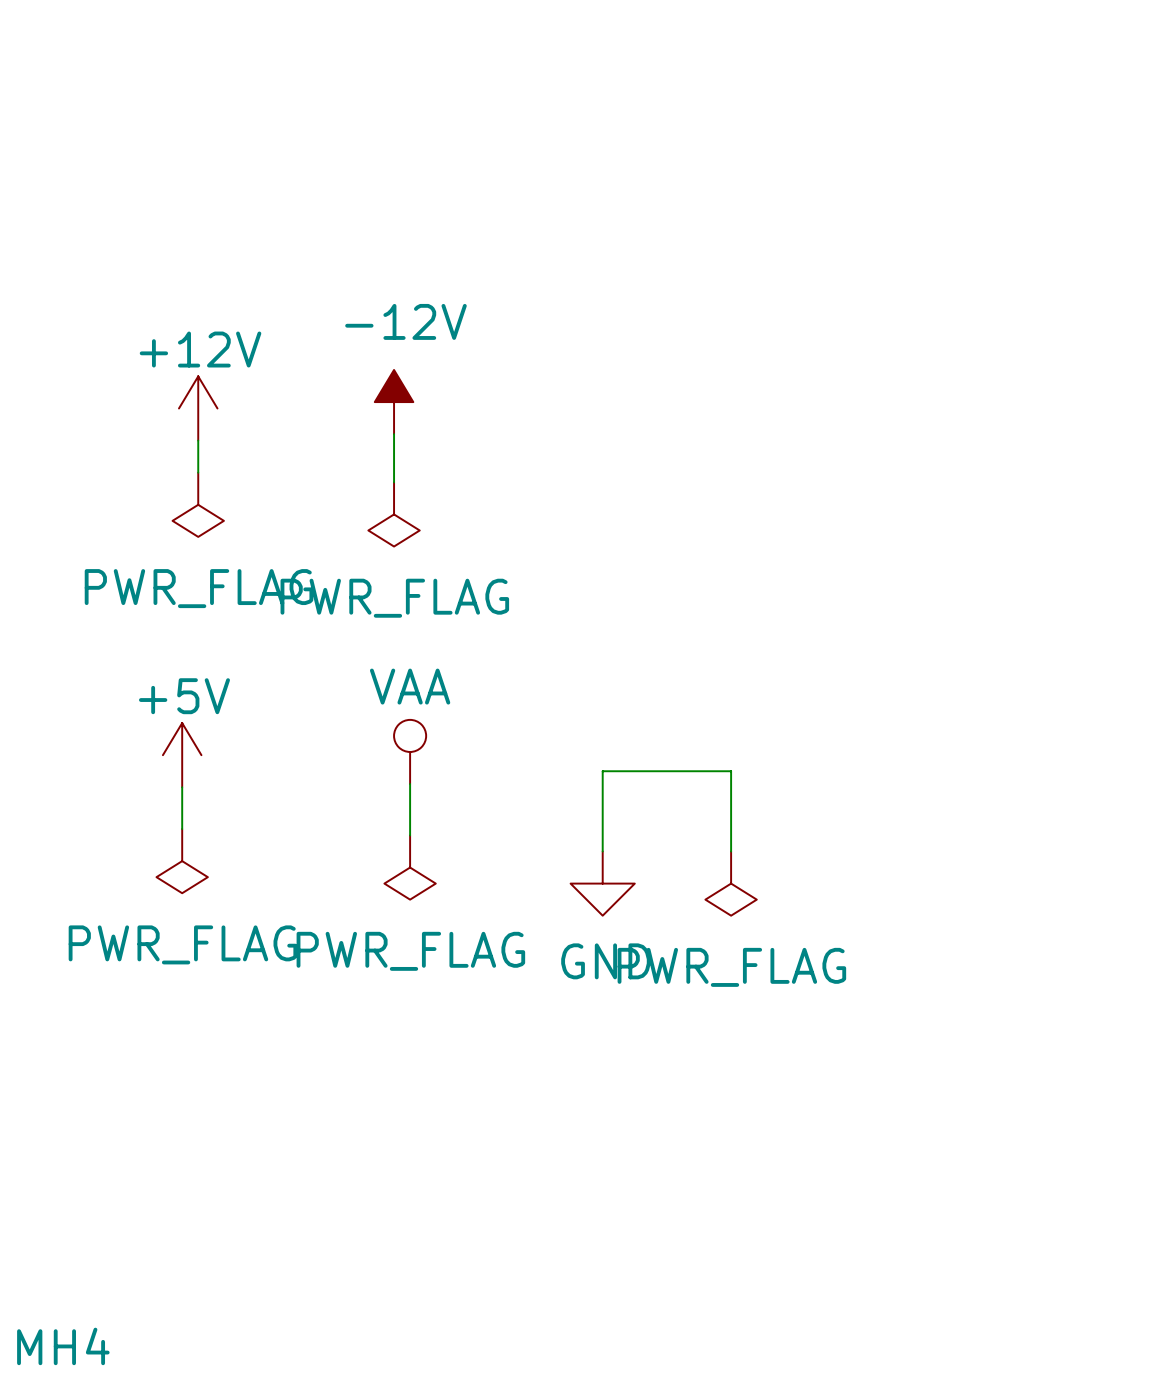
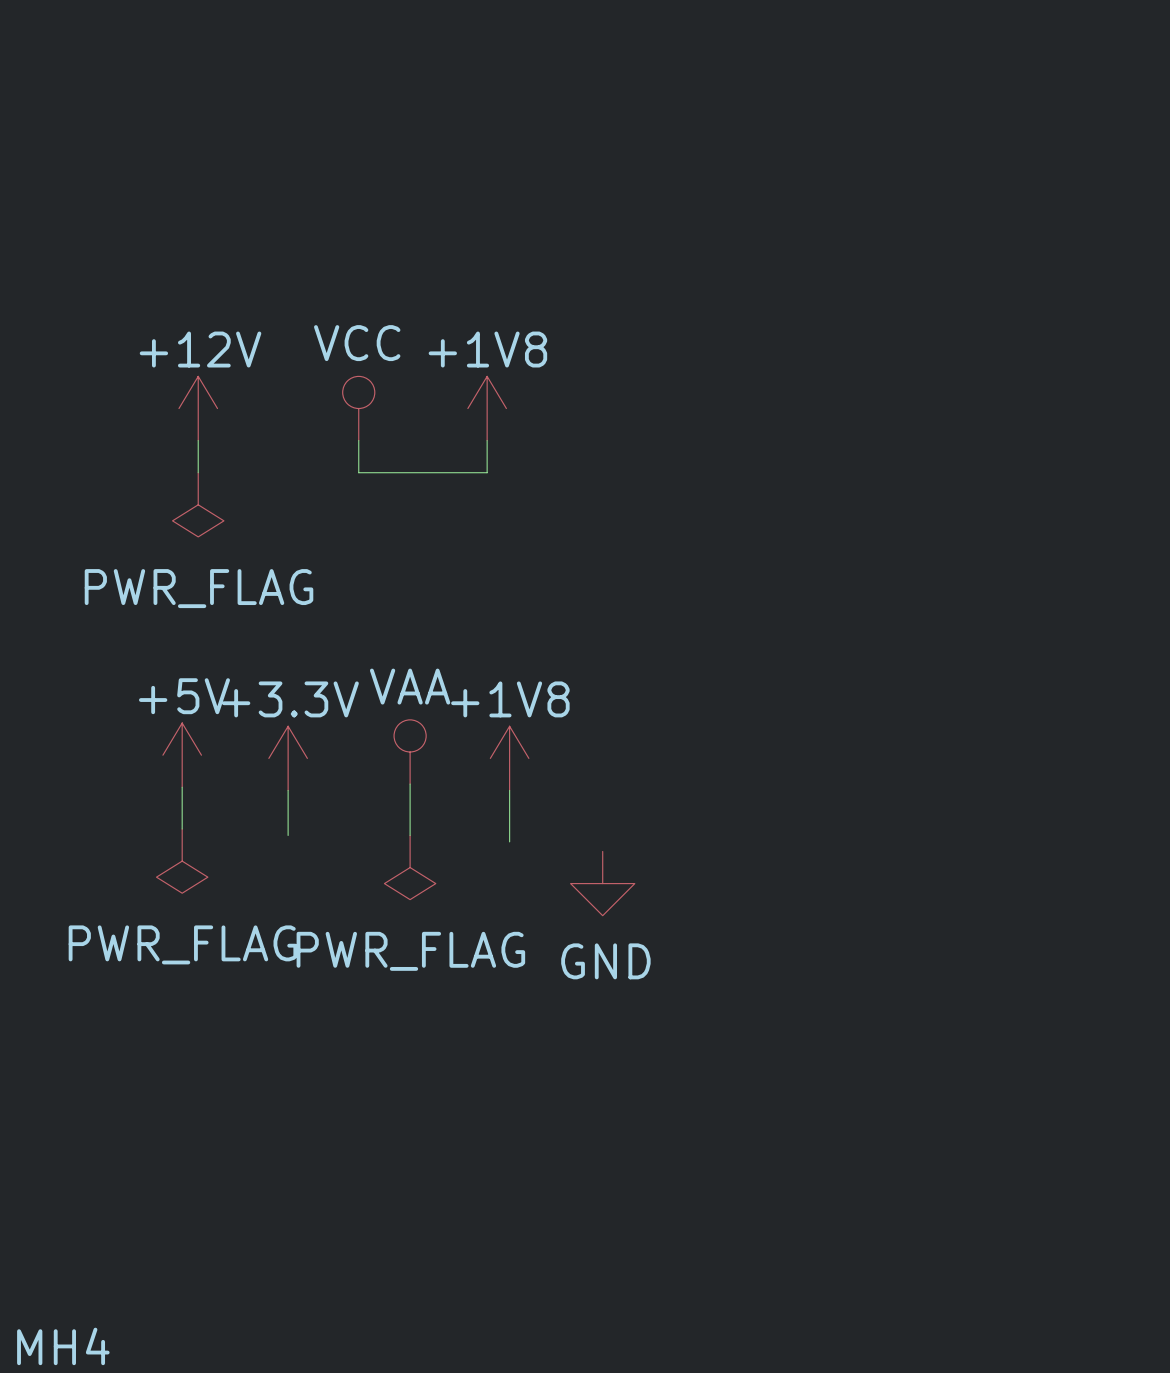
power symbol: -12V (394, 402) -> none
power symbol: none -> VCC (358, 408)
power symbol: none -> +1V8 (487, 408)
wire: (394, 434) (394, 482) -> none
wire: none -> (358, 440) (358, 472) (487, 472) (487, 440)
power symbol: PWR_FLAG (394, 514) -> none
power symbol: none -> +3.3V (288, 758)
power symbol: none -> +1V8 (509, 758)
wire: none -> (288, 790) (288, 835)
wire: none -> (509, 790) (509, 841)
wire: (602, 851) (602, 771) (731, 771) (731, 851) -> none
power symbol: PWR_FLAG (731, 883) -> none

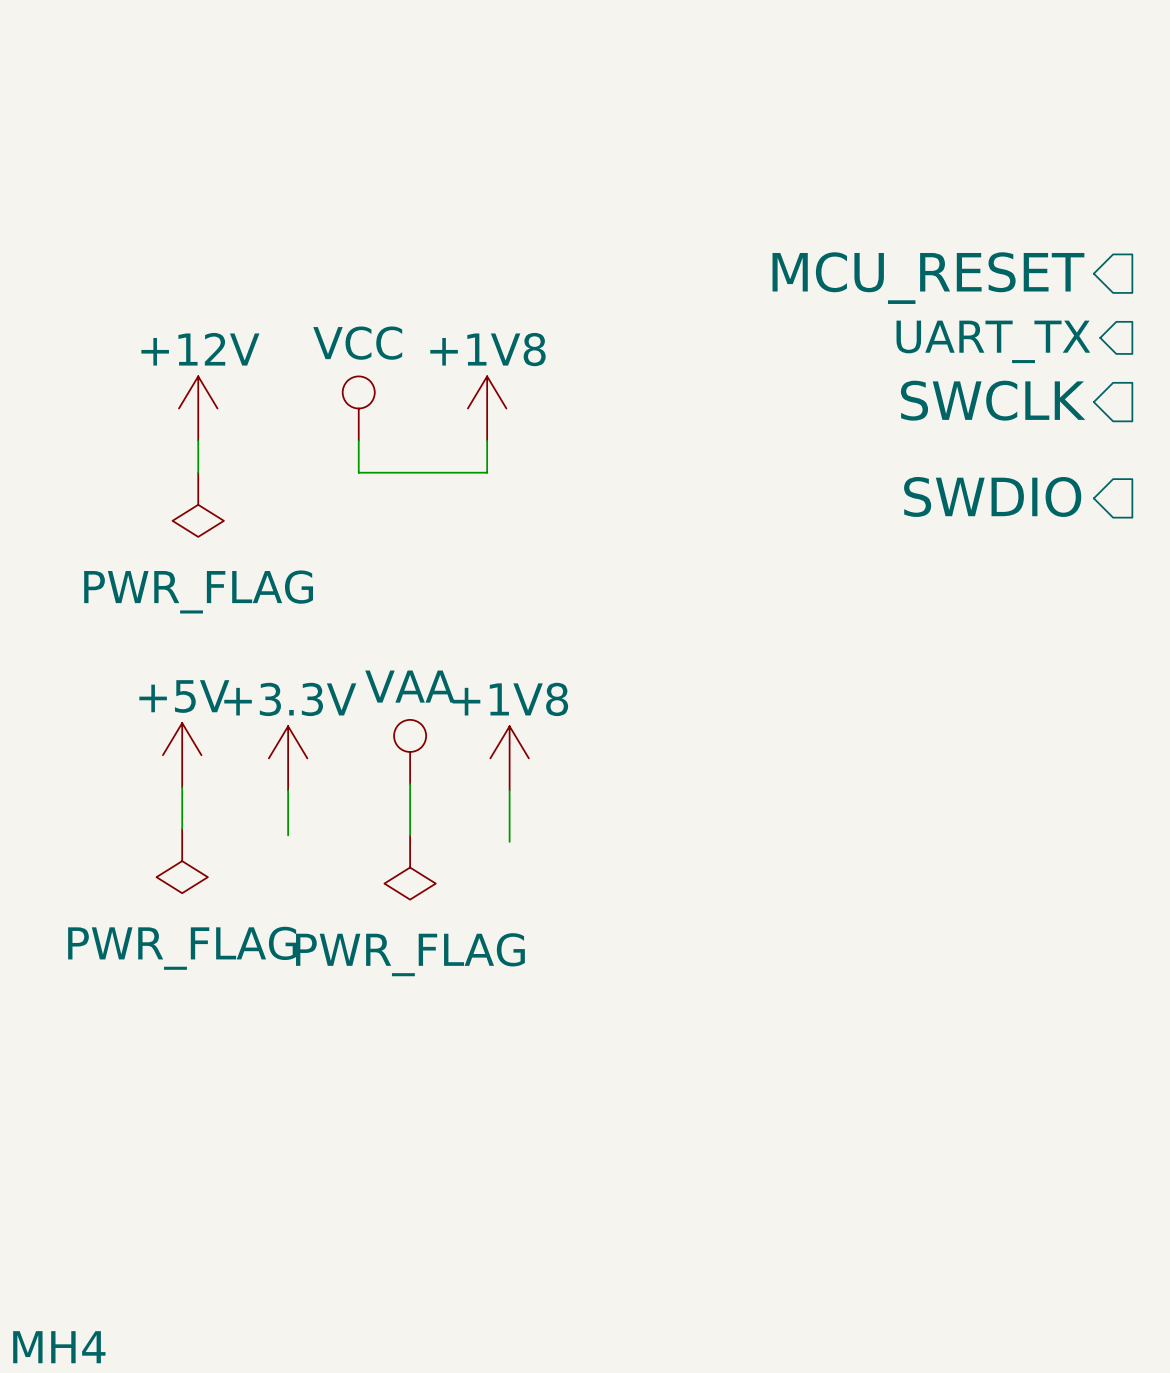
sheet pin: none -> MCU_RESET (928, 278)
sheet pin: none -> UART_TX (993, 341)
sheet pin: none -> SWCLK (993, 400)
sheet pin: none -> SWDIO (992, 496)
power symbol: GND (602, 883) -> none

